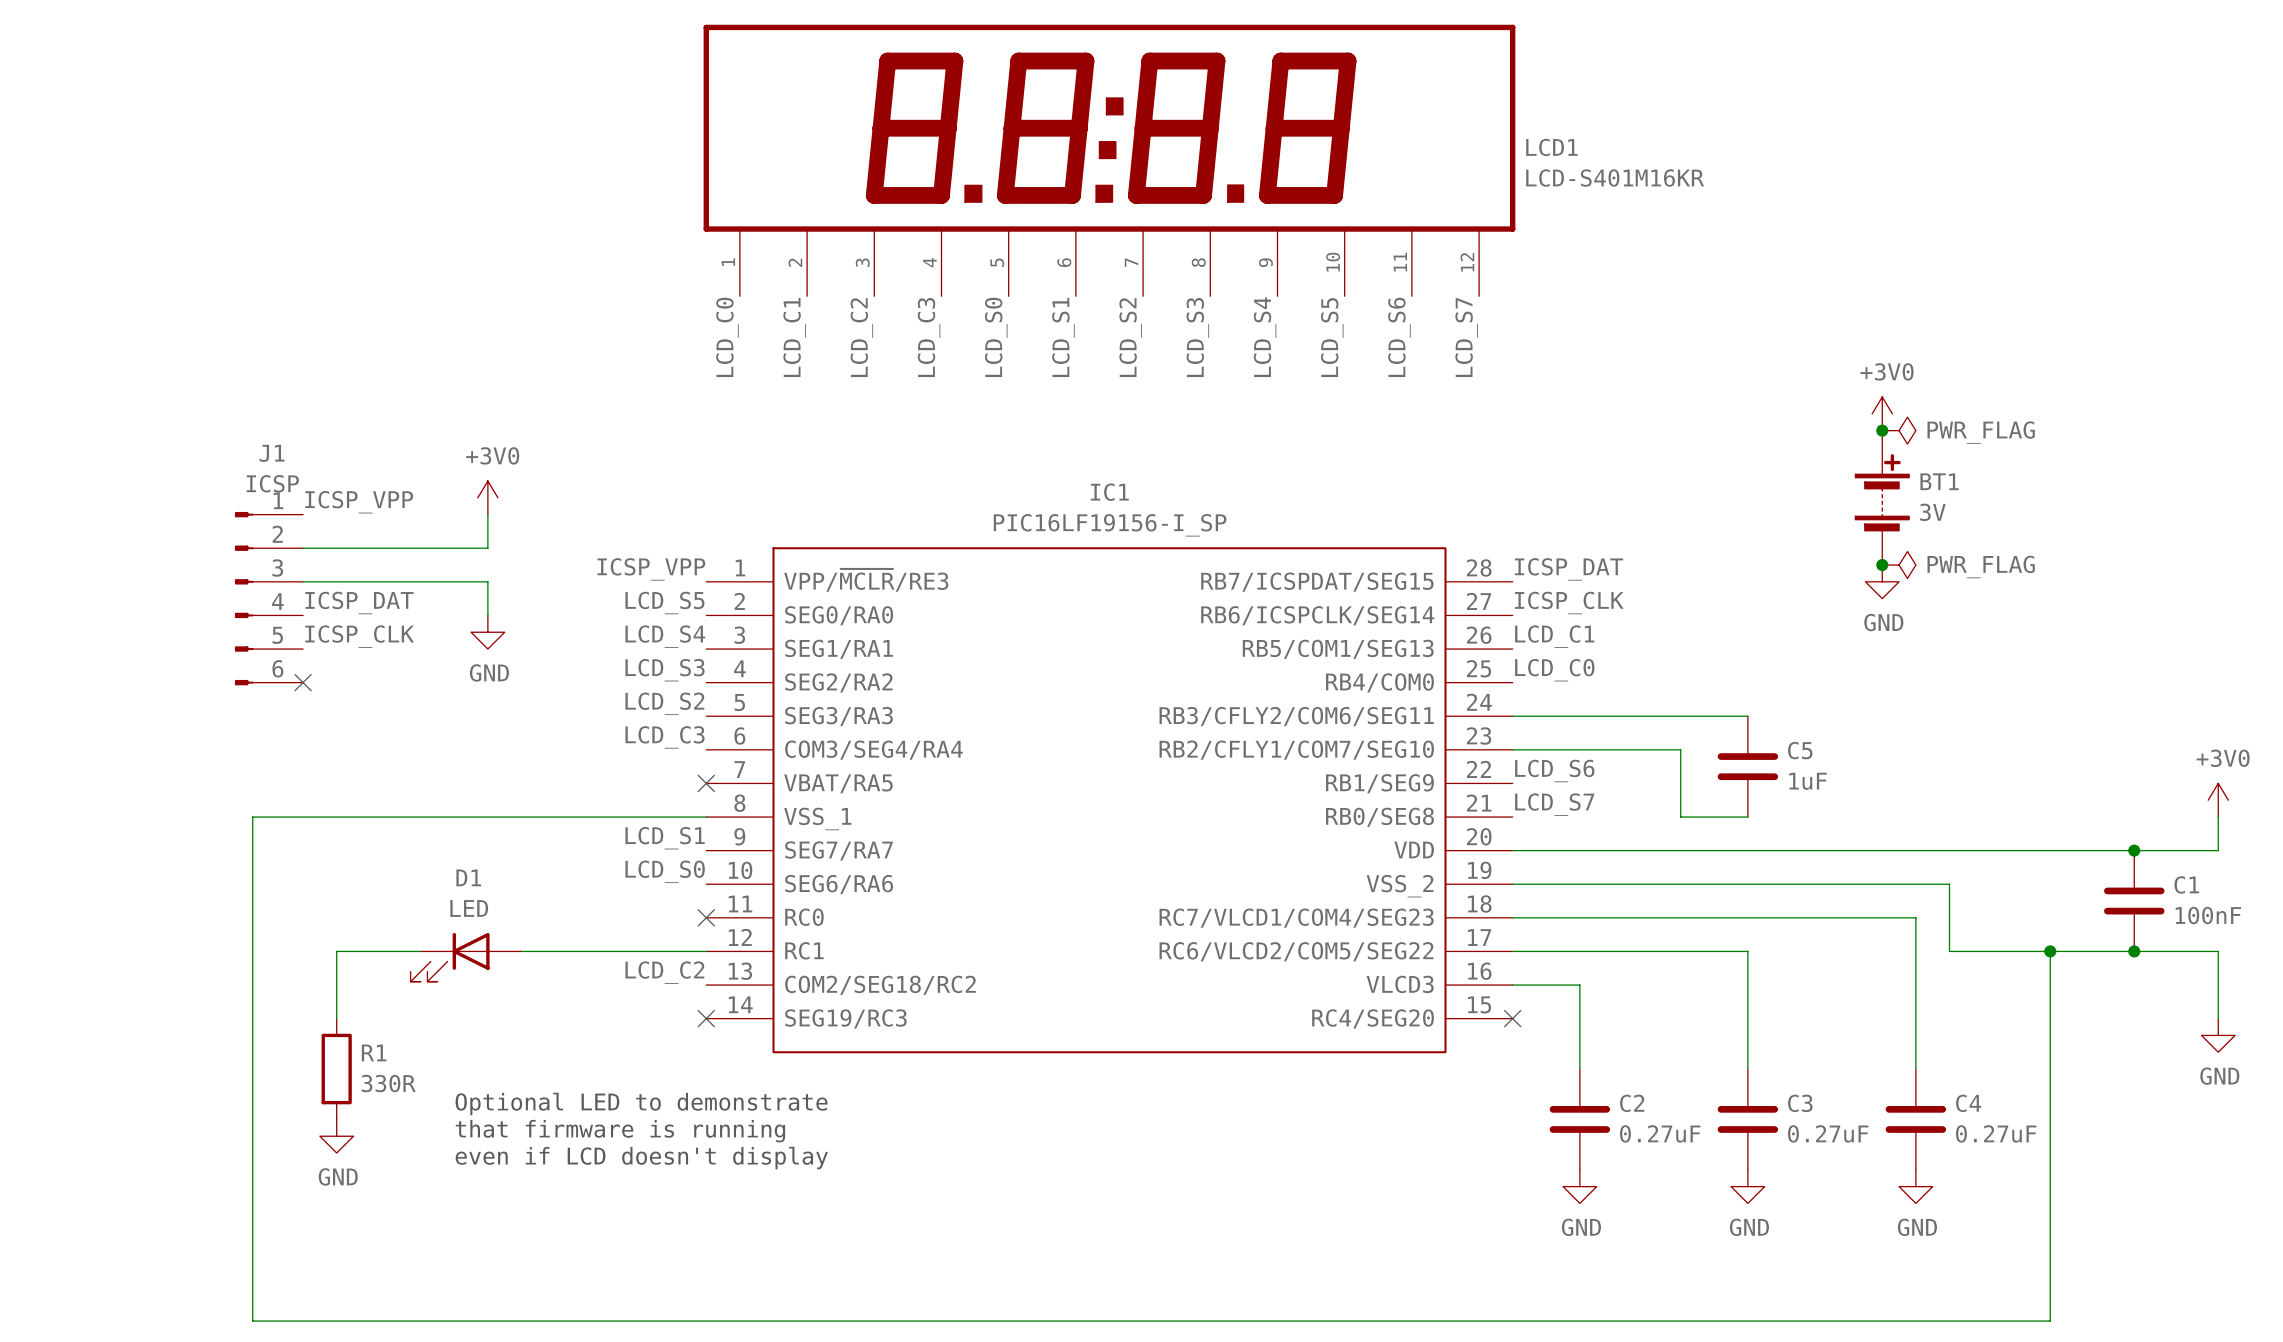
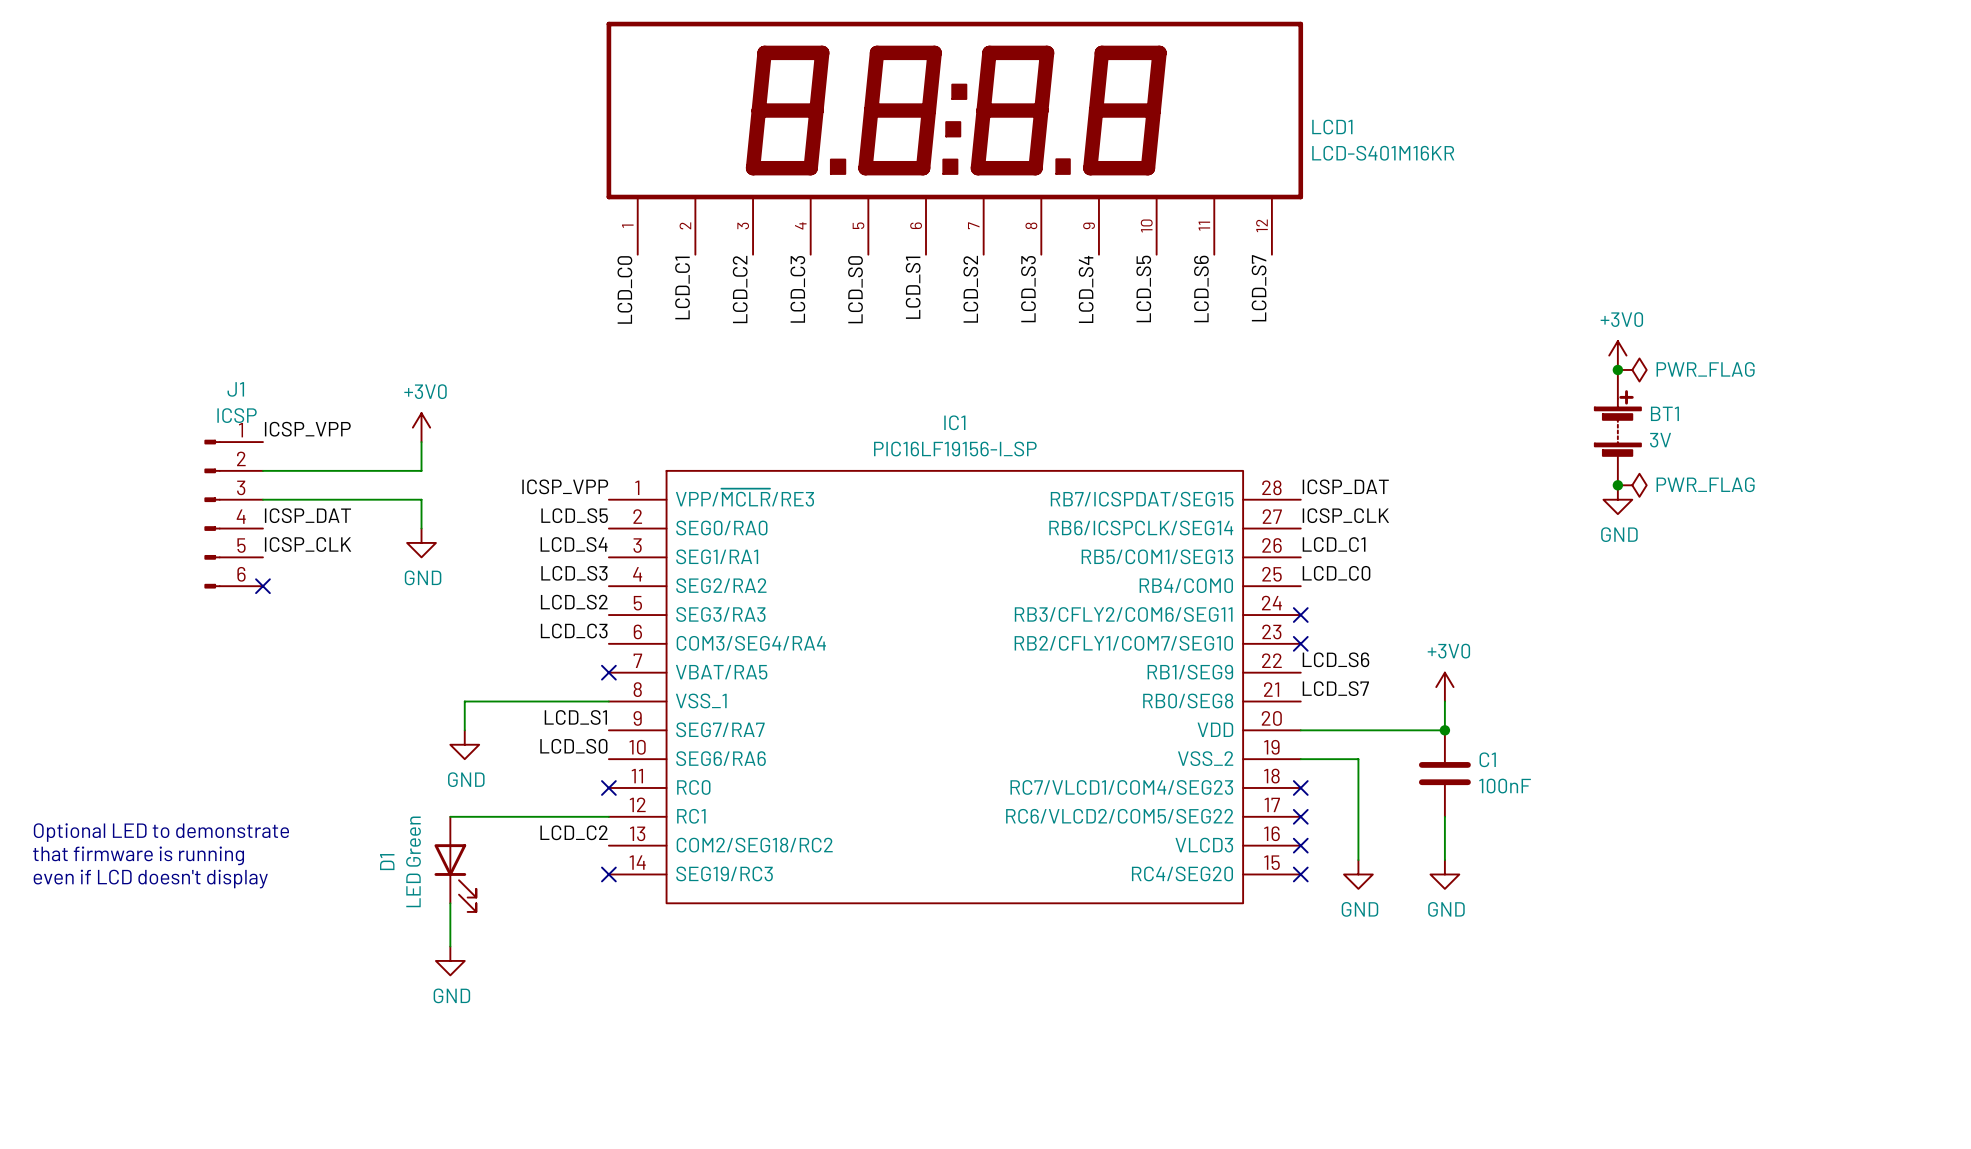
wire: (1512, 716) (1747, 716) -> none
no-connect mark: none -> (1300, 615)
wire: (1512, 749) (1680, 749) (1680, 817) (1747, 817) -> none
no-connect mark: none -> (1300, 643)
C5: 1uF (1747, 766) -> none
power symbol: none -> +3V0 (1444, 687)
power symbol: +3V0 (2218, 800) -> none
wire: (538, 817) (252, 817) (252, 1321) (2050, 1321) (2050, 951) -> (464, 701) (464, 730)
wire: (2218, 817) (2218, 850) (1680, 850) -> (1444, 701) (1444, 730)
junction: none -> (1444, 730)
junction: (2134, 850) -> none
power symbol: none -> GND (464, 744)
wire: (1579, 884) (1949, 884) (1949, 951) (2218, 951) (2218, 1018) -> none
C1 position: (2134, 901) -> (1444, 773)
D1 value: LED (469, 908) -> LED Green (413, 861)
wire: (1512, 917) (1915, 917) (1915, 1069) -> none
no-connect mark: none -> (1300, 787)
wire: (420, 951) (336, 951) (336, 1018) -> none
wire: (1512, 951) (1747, 951) (1747, 1069) -> none
no-connect mark: none -> (1300, 816)
wire: none -> (1444, 816) (1444, 860)
junction: (2050, 951) -> none
junction: (2134, 951) -> none
D1 rotation: 0° (450, 957) -> 90° counterclockwise (455, 878)
D1 position: (466, 957) -> (455, 864)
text: none -> Optional LED to demonstrate (161, 832)
wire: (1512, 985) (1579, 985) -> (1358, 759) (1358, 845)
no-connect mark: none -> (1300, 845)
text: none -> that firmware is running (138, 855)
wire: (1579, 1001) (1579, 1069) -> none
power symbol: none -> GND (1358, 874)
power symbol: none -> GND (1444, 874)
text: none -> even if LCD doesn't display (150, 879)
power symbol: GND (2218, 1035) -> none
wire: none -> (450, 903) (450, 946)
R1: 330R (336, 1069) -> none
text: Optional LED to demonstrate (641, 1103) -> none
power symbol: none -> GND (450, 960)
C2: 0.27uF (1579, 1119) -> none
C3: 0.27uF (1747, 1119) -> none
C4: 0.27uF (1915, 1119) -> none
text: that firmware is running (620, 1131) -> none
power symbol: GND (336, 1136) -> none
text: even if LCD doesn't display (641, 1158) -> none
power symbol: GND (1579, 1186) -> none
power symbol: GND (1747, 1186) -> none
power symbol: GND (1915, 1186) -> none

